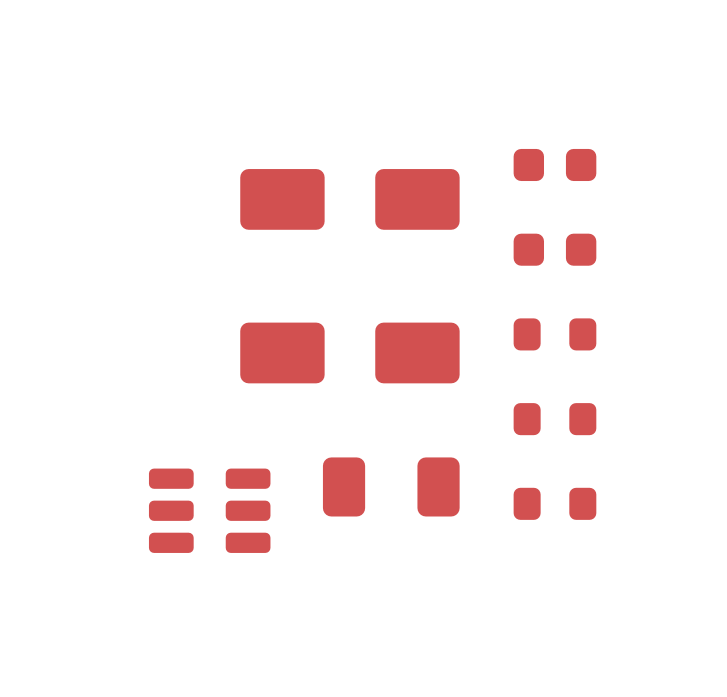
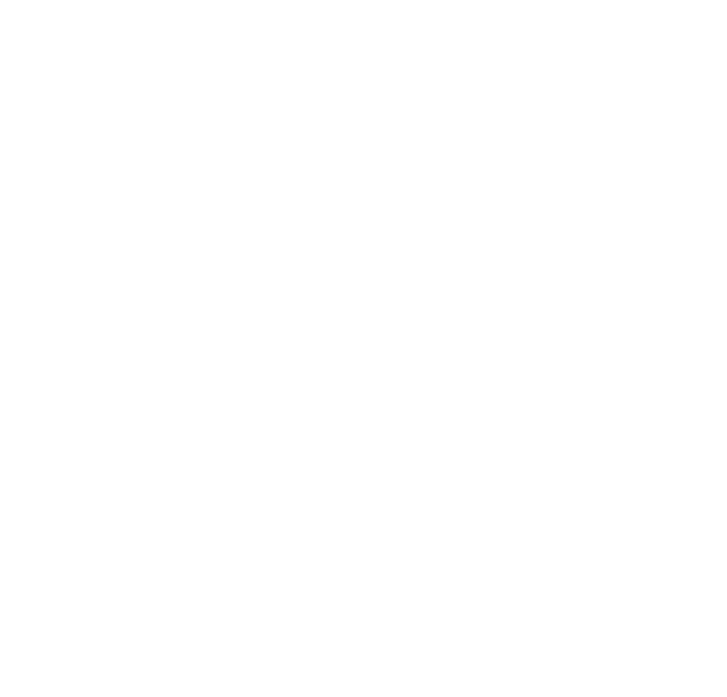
part: (554, 164) -> none
part: (349, 199) -> none
part: (554, 249) -> none
part: (554, 334) -> none
part: (349, 352) -> none
part: (554, 419) -> none
part: (391, 486) -> none
part: (554, 503) -> none
part: (209, 510) -> none

